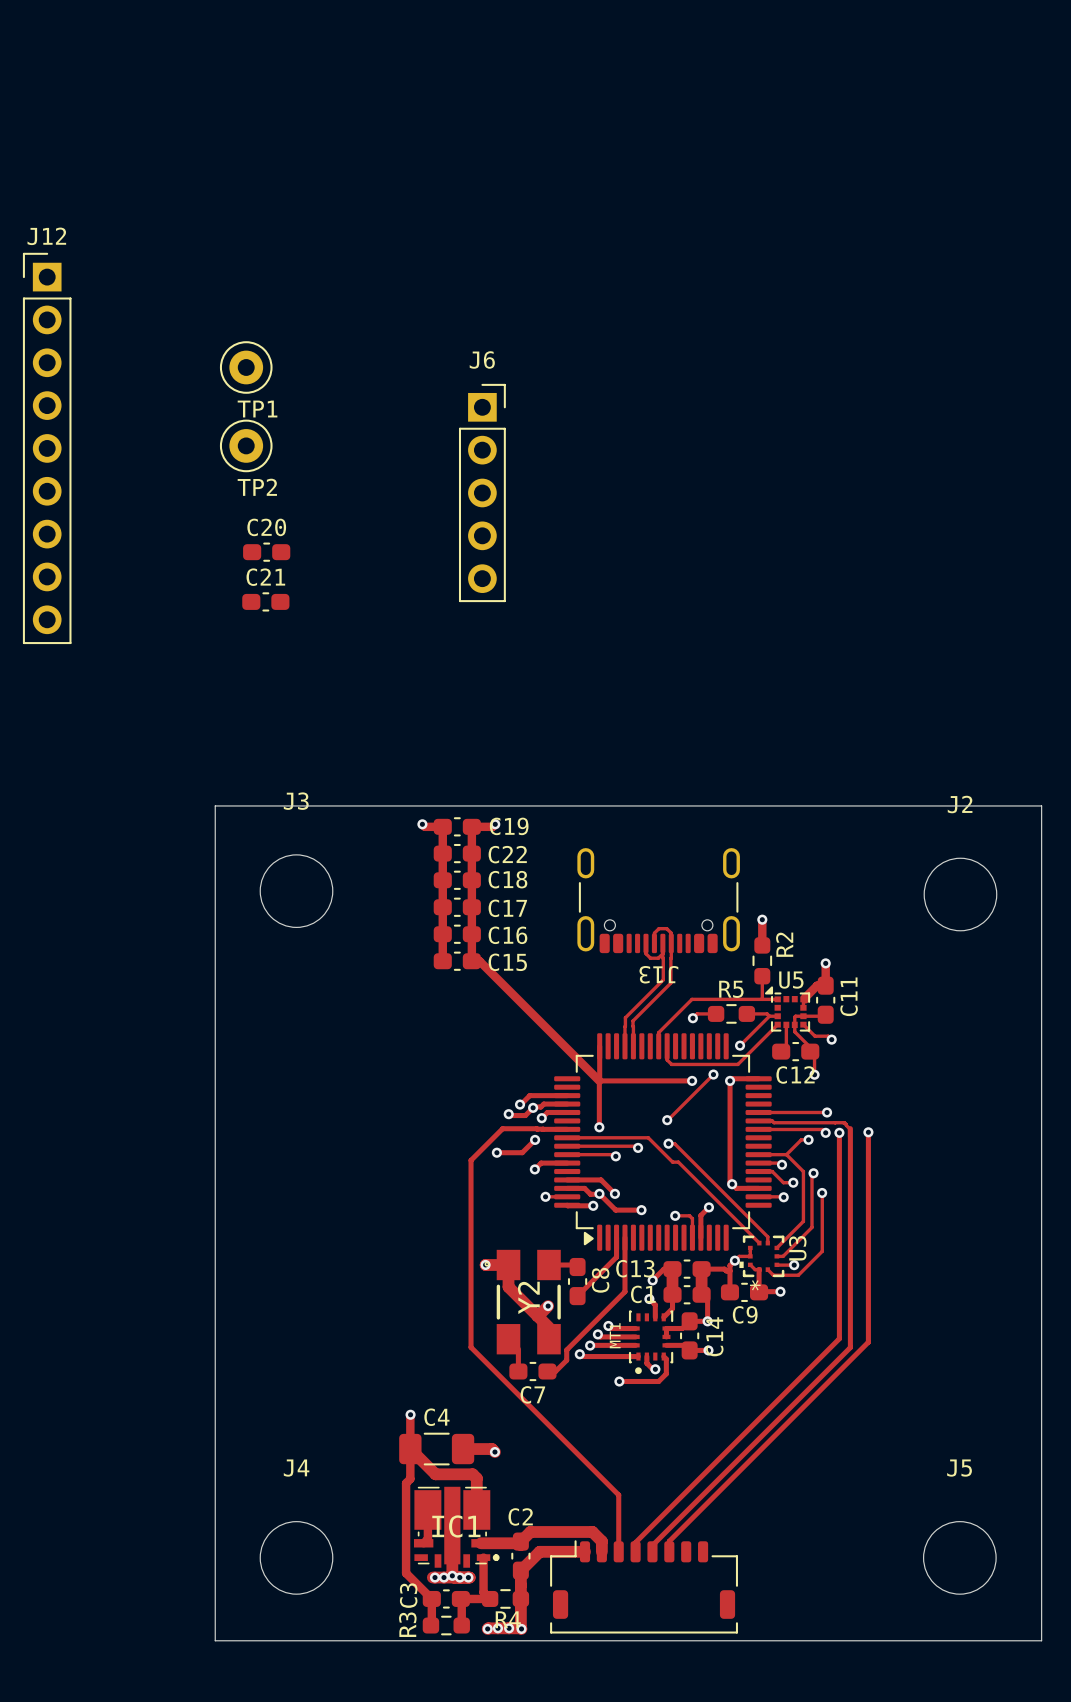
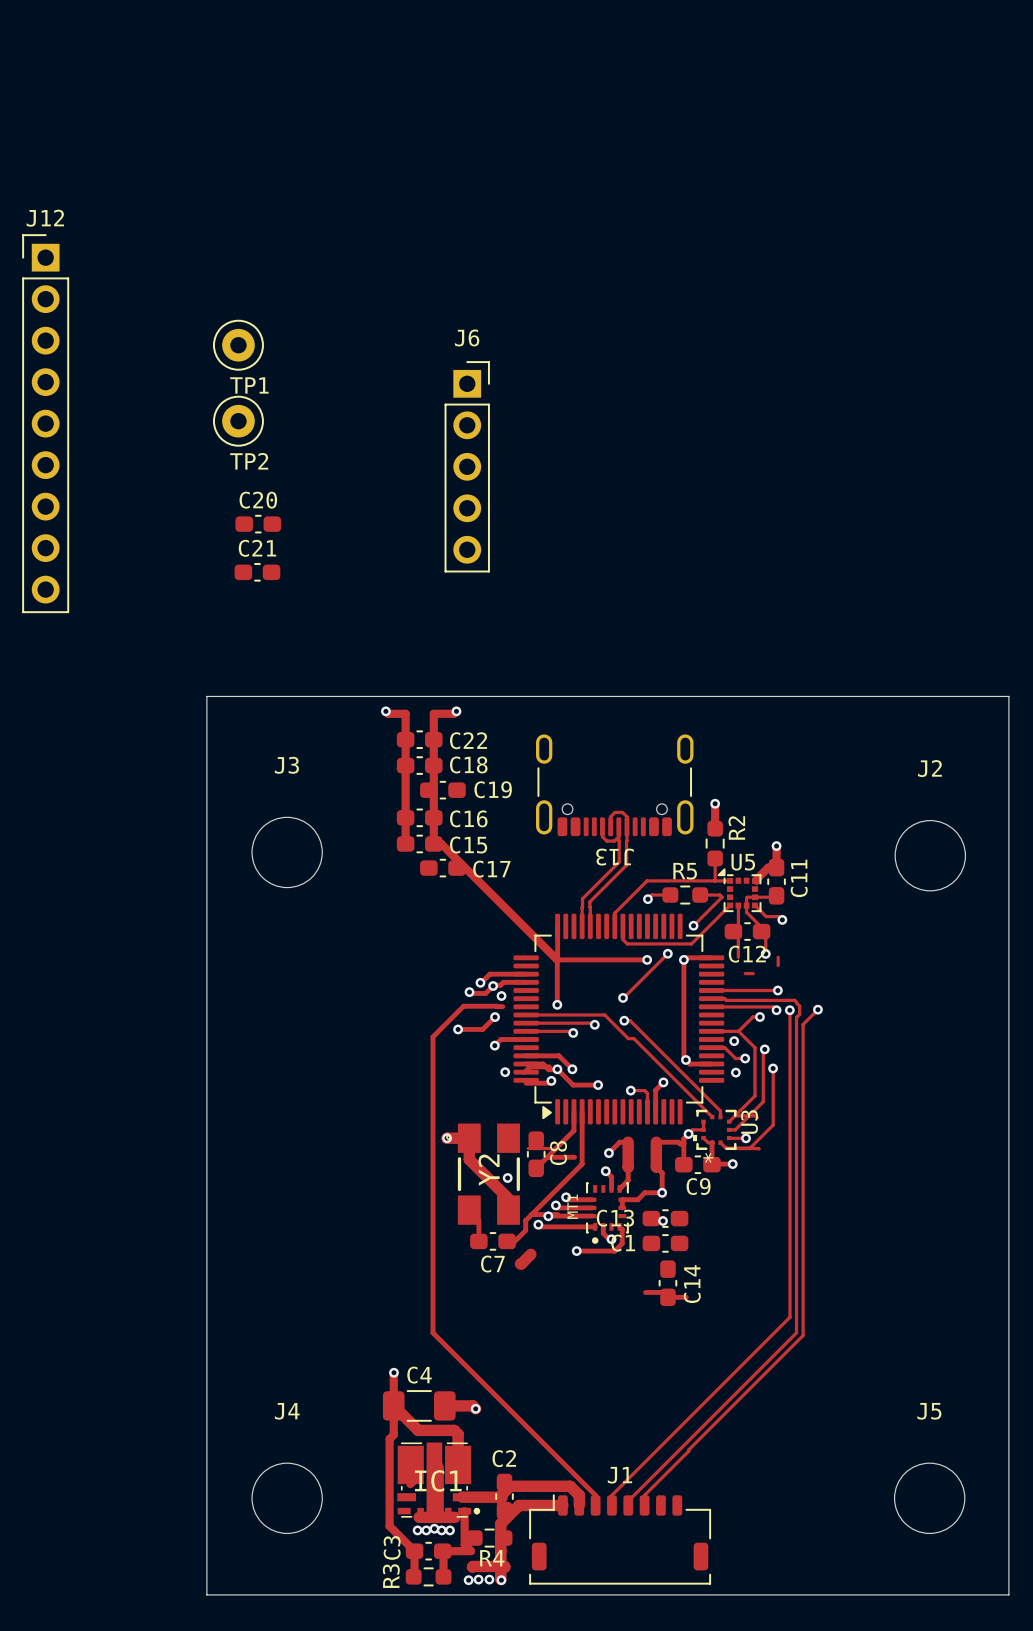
via: none -> (385, 711)
via: none -> (456, 711)
board edge: (1041, 805) (215, 805) (215, 1640) (1041, 1640) -> (1008, 769) (1008, 696) (206, 696) (206, 1594) (1008, 1594) (1008, 1578)
track: (422, 824) (424, 826) (442, 826) (442, 961) -> (385, 711) (388, 713) (405, 713) (405, 843)
via: (422, 824) -> none
track: (495, 824) (492, 826) (471, 826) (471, 961) (479, 961) (599, 1080) -> (456, 711) (454, 713) (433, 713) (433, 843) (441, 843) (557, 959)
via: (495, 824) -> none
track: none -> (715, 803) (715, 828)
via: none -> (715, 803)
C22 position: (457, 853) -> (419, 739)
C18 position: (457, 880) -> (419, 765)
via: none -> (776, 846)
track: none -> (715, 858) (715, 880)
J13 position: (658, 900) -> (614, 785)
track: (762, 919) (762, 945) -> (733, 931) (738, 926) (738, 905)
via: (762, 919) -> none
C16 position: (457, 934) -> (419, 817)
via: none -> (647, 899)
track: (646, 943) (646, 953) (650, 958) (658, 958) (662, 953) -> (602, 826) (602, 836) (606, 841) (614, 841) (618, 836)
track: (654, 943) (654, 933) (658, 928) (666, 928) (671, 933) (670, 983) (633, 1020) (633, 1046) -> (610, 826) (610, 816) (615, 812) (622, 812) (626, 816) (626, 865) (589, 901) (590, 926)
track: (662, 943) (663, 979) (625, 1017) (624, 1046) -> (618, 826) (619, 862) (582, 898) (582, 926)
R2 position: (762, 960) -> (715, 843)
C15 position: (457, 961) -> (419, 843)
track: (825, 963) (825, 985) (817, 985) (805, 999) -> (776, 846) (776, 867) (768, 867) (756, 880)
via position: (825, 963) -> (782, 919)
via: none -> (693, 925)
via: none -> (667, 953)
via: none -> (765, 953)
track: (777, 999) (692, 999) (658, 1032) (658, 1046) -> (730, 880) (647, 880) (614, 913) (614, 926)
C11 position: (825, 1000) -> (776, 881)
via: none -> (647, 959)
via: none -> (683, 959)
U5 position: (787, 1008) -> (739, 890)
track: (716, 1013) (697, 1013) (692, 1018) -> (670, 895) (652, 895) (647, 899)
R5 position: (731, 1013) -> (685, 895)
track: (746, 1013) (767, 1013) (769, 1016) (740, 1045) -> (700, 895) (719, 895) (722, 897) (693, 925)
track: (825, 1014) (794, 1017) (794, 1031) (810, 1047) (810, 1051) -> (776, 895) (746, 898) (746, 912) (761, 927) (761, 931)
via: (692, 1018) -> none
track: (777, 1024) (737, 1064) (671, 1064) (667, 1059) (667, 1046) -> (730, 905) (691, 943) (627, 943) (622, 939) (622, 926)
track: (786, 1024) (786, 1046) (781, 1051) -> none
track: (803, 1024) (814, 1036) (828, 1036) (831, 1039) -> (754, 905) (766, 916) (779, 916) (782, 919)
via: none -> (480, 982)
via: none -> (493, 986)
via: none -> (777, 990)
via: none -> (469, 992)
via: none -> (501, 996)
via: (831, 1039) -> none
via: none -> (623, 997)
track: none -> (711, 998) (794, 1000) (799, 1006) (799, 1014) (796, 1017) (796, 1332) (628, 1501)
via: (740, 1045) -> none
track: (599, 1046) (599, 1080) -> (557, 926) (557, 959)
via: none -> (557, 1004)
track: none -> (502, 1006) (463, 1006) (433, 1036) (433, 1332) (595, 1495) (595, 1505) (595, 1495)
C12 position: (795, 1051) -> (747, 931)
track: none -> (817, 1009) (803, 1024) (803, 1335) (644, 1495) (644, 1505)
via: none -> (817, 1009)
via: none -> (776, 1010)
track: none -> (789, 1010) (789, 1317) (611, 1495) (611, 1505)
via: none -> (789, 1010)
track: (814, 1055) (814, 1074) -> (765, 935) (765, 953)
via: none -> (495, 1017)
via: none -> (759, 1017)
via: none -> (624, 1020)
via: none -> (594, 1024)
via: none -> (458, 1029)
track: (713, 1074) (667, 1120) -> (667, 953) (623, 997)
via: (713, 1074) -> none
via: (814, 1074) -> none
via: none -> (573, 1032)
track: (758, 1078) (732, 1078) (730, 1080) (730, 1182) (736, 1188) (758, 1188) -> (711, 957) (685, 957) (683, 959) (683, 1057) (689, 1064) (711, 1064)
track: (599, 1080) (599, 1126) -> (557, 959) (557, 1004)
track: (599, 1080) (692, 1080) -> (557, 959) (647, 959)
via: (692, 1080) -> none
via: (730, 1080) -> none
via: none -> (734, 1041)
via: none -> (494, 1045)
via: none -> (764, 1049)
track: (567, 1095) (529, 1095) (520, 1104) -> (526, 974) (489, 974) (481, 982)
via: none -> (745, 1058)
via: (520, 1104) -> none
track: (567, 1104) (543, 1104) (540, 1106) (533, 1106) (525, 1115) (508, 1114) -> (526, 982) (503, 982) (500, 985) (493, 985) (485, 993) (469, 992)
via: none -> (685, 1059)
via: (533, 1107) -> none
track: (758, 1112) (827, 1112) -> (711, 990) (777, 990)
via: (827, 1112) -> none
via: (508, 1114) -> none
via: none -> (557, 1069)
via: none -> (572, 1069)
via: none -> (773, 1068)
via: none -> (505, 1072)
via: (541, 1118) -> none
via: none -> (735, 1072)
via: (667, 1120) -> none
track: (758, 1120) (844, 1122) (849, 1128) (849, 1137) -> none
via: none -> (551, 1080)
via: (599, 1127) -> none
via: none -> (663, 1082)
track: (850, 1128) (850, 1347) (652, 1545) (652, 1551) -> none
track: (543, 1129) (502, 1128) (471, 1160) -> none
track: (758, 1129) (822, 1129) (825, 1132) -> (711, 1006) (773, 1006) (776, 1010)
via: none -> (598, 1085)
via: (825, 1132) -> none
via: (839, 1132) -> none
track: (868, 1132) (868, 1342) (669, 1541) (669, 1551) -> none
via: (868, 1132) -> none
track: (839, 1133) (839, 1338) (635, 1542) (635, 1551) -> none
via: none -> (630, 1090)
track: (567, 1137) (648, 1137) (672, 1162) (678, 1162) (759, 1243) -> (526, 1015) (604, 1015) (628, 1038) (633, 1038) (712, 1117)
track: (535, 1139) (522, 1152) (496, 1152) -> (495, 1017) (482, 1029) (458, 1029)
via: (535, 1139) -> none
track: (808, 1139) (801, 1139) (786, 1154) -> (759, 1017) (752, 1017) (738, 1031)
via: (808, 1139) -> none
part position: (662, 1142) -> (618, 1019)
track: (668, 1143) (674, 1143) (767, 1236) (767, 1243) -> (624, 1020) (630, 1020) (720, 1110) (720, 1117)
via: (668, 1143) -> none
track: (567, 1146) (636, 1146) (638, 1147) -> (526, 1023) (593, 1023) (594, 1024)
via: (638, 1147) -> none
via: (496, 1152) -> none
track: (567, 1154) (614, 1154) (615, 1156) -> (526, 1031) (571, 1031) (573, 1032)
track: (758, 1154) (786, 1154) -> (711, 1031) (738, 1031)
track: (786, 1154) (803, 1171) (803, 1221) (776, 1247) -> (738, 1031) (754, 1047) (754, 1095) (729, 1121)
via: (615, 1156) -> none
track: (471, 1160) (471, 1347) (618, 1495) (618, 1551) -> none
track: (567, 1163) (541, 1163) (534, 1169) -> (526, 1039) (500, 1039) (494, 1046)
via: (782, 1164) -> none
via: (534, 1169) -> none
track: (758, 1171) (772, 1171) (783, 1182) (793, 1182) -> (711, 1047) (724, 1047) (735, 1058) (745, 1058)
track: (813, 1173) (812, 1174) (812, 1227) (783, 1256) (776, 1256) -> (764, 1049) (763, 1101) (735, 1129) (729, 1129)
via: (813, 1173) -> none
track: (567, 1179) (601, 1179) (614, 1193) -> (526, 1055) (558, 1055) (572, 1069)
via: none -> (688, 1134)
via: (793, 1182) -> none
via: (732, 1184) -> none
via: none -> (447, 1138)
via: none -> (746, 1138)
track: (567, 1188) (584, 1188) (590, 1194) (599, 1193) (615, 1210) (641, 1210) -> (526, 1064) (543, 1064) (548, 1069) (557, 1069) (573, 1085) (598, 1085)
via: (822, 1192) -> none
via: (599, 1193) -> none
via: (614, 1193) -> none
track: (822, 1193) (822, 1251) (798, 1275) (773, 1275) (767, 1269) -> (773, 1068) (773, 1125) (750, 1148) (725, 1148) (720, 1142)
via: (545, 1196) -> none
via: (783, 1197) -> none
via: none -> (608, 1153)
via: (593, 1205) -> none
track: (708, 1207) (700, 1215) (700, 1237) -> (663, 1082) (655, 1090) (655, 1111)
via: (708, 1207) -> none
via: (641, 1210) -> none
via: none -> (732, 1164)
track: (675, 1215) (689, 1215) (692, 1218) (692, 1237) -> (630, 1090) (644, 1090) (647, 1093) (647, 1111)
via: (675, 1215) -> none
via: none -> (605, 1171)
via: none -> (507, 1178)
track: (616, 1237) (616, 1257) (577, 1296) -> (573, 1111) (573, 1130) (536, 1168)
track: (624, 1237) (624, 1291) (566, 1350) (566, 1360) (555, 1371) (547, 1371) -> (582, 1111) (582, 1164) (525, 1220) (525, 1230) (514, 1241) (507, 1241)
via: none -> (662, 1192)
via: none -> (566, 1197)
track: (750, 1247) (750, 1256) (739, 1256) (734, 1260) -> (703, 1121) (703, 1129) (692, 1129) (688, 1134)
via: none -> (555, 1205)
U3 position: (761, 1256) -> (714, 1129)
track: (734, 1260) (729, 1265) (729, 1292) -> (688, 1134) (683, 1138) (683, 1164)
via: (734, 1260) -> none
via: (485, 1264) -> none
track: (750, 1264) (755, 1269) (759, 1269) (759, 1291) (780, 1291) -> (703, 1138) (708, 1142) (712, 1142) (712, 1164) (732, 1164)
track: (776, 1264) (794, 1265) -> (729, 1138) (746, 1138)
track: (485, 1265) (508, 1265) (508, 1287) (548, 1327) -> (447, 1138) (469, 1138) (469, 1159) (508, 1198)
via: (794, 1265) -> none
via: none -> (548, 1216)
track: (729, 1270) (701, 1269) (701, 1294) (707, 1300) (707, 1321) (689, 1321) (682, 1328) (666, 1328) (666, 1336) -> (683, 1143) (656, 1142) (656, 1167) (662, 1172) (662, 1192) (644, 1192) (637, 1199) (622, 1199) (622, 1207)
via: none -> (663, 1220)
via: none -> (538, 1224)
track: (652, 1280) (663, 1269) (672, 1269) (672, 1308) (663, 1317) -> (608, 1153) (619, 1142) (628, 1142) (628, 1180) (619, 1188)
via: (652, 1280) -> none
C8 position: (577, 1281) -> (536, 1154)
via: none -> (611, 1239)
via: (780, 1291) -> none
C9 position: (744, 1292) -> (697, 1164)
track: (649, 1299) (655, 1304) (655, 1317) -> (605, 1171) (611, 1176) (611, 1188)
via: (649, 1299) -> none
Y2 position: (522, 1302) -> (483, 1174)
via: none -> (576, 1251)
via: (548, 1306) -> none
via: (707, 1321) -> none
track: (608, 1325) (610, 1328) (635, 1328) -> (566, 1197) (568, 1199) (592, 1199)
via: (608, 1325) -> none
track: (597, 1334) (600, 1336) (635, 1336) -> (555, 1205) (558, 1207) (592, 1207)
via: (597, 1334) -> none
MT1 position: (651, 1342) -> (607, 1213)
track: (590, 1345) (635, 1345) -> (548, 1216) (592, 1216)
via: (590, 1345) -> none
track: (518, 1349) (518, 1371) -> (478, 1219) (478, 1241)
via: (708, 1350) -> none
track: (579, 1354) (582, 1356) (638, 1356) -> (538, 1224) (540, 1226) (595, 1226)
via: (579, 1354) -> none
track: (646, 1356) (646, 1363) (655, 1369) -> (603, 1226) (603, 1233) (611, 1239)
track: (663, 1356) (666, 1359) (666, 1373) (658, 1381) (619, 1381) -> (619, 1226) (622, 1229) (622, 1243) (614, 1251) (576, 1251)
via: (655, 1369) -> none
C7 position: (532, 1371) -> (492, 1241)
via: (619, 1381) -> none
track: (410, 1414) (410, 1478) (406, 1483) (406, 1573) (431, 1598) (430, 1625) -> (393, 1372) (393, 1434) (389, 1439) (389, 1526) (414, 1551) (413, 1576)
via position: (410, 1414) -> (393, 1372)
track: (410, 1449) (435, 1474) (472, 1474) (476, 1478) (476, 1509) -> (393, 1405) (418, 1430) (454, 1430) (458, 1434) (458, 1464)
C4 position: (436, 1449) -> (419, 1405)
track: (463, 1449) (491, 1449) (494, 1452) -> (444, 1405) (472, 1405) (475, 1408)
via position: (494, 1452) -> (475, 1408)
IC1 position: (456, 1527) -> (438, 1481)
J1 name: none -> J1 (619, 1475)
track: (520, 1541) (530, 1531) (592, 1531) (601, 1541) (601, 1551) -> (500, 1495) (510, 1486) (570, 1486) (579, 1495) (579, 1505)
track: (481, 1543) (522, 1543) -> (462, 1497) (502, 1497)
track: (585, 1551) (539, 1551) (520, 1570) (520, 1628) -> (562, 1505) (519, 1505) (500, 1523) (500, 1579)
track: (483, 1557) (483, 1592) (490, 1598) (460, 1598) (461, 1625) -> (464, 1511) (464, 1544) (471, 1551) (442, 1551) (443, 1576)
via: (452, 1575) -> none
via: (434, 1577) -> none
via: (443, 1577) -> none
via: (459, 1577) -> none
via: (468, 1577) -> none
J1 position: (644, 1586) -> (620, 1539)
via: none -> (434, 1528)
via: none -> (417, 1530)
via: none -> (426, 1530)
via: none -> (441, 1530)
via: none -> (449, 1530)
C3 position: (446, 1598) -> (428, 1551)
R3 position: (446, 1625) -> (428, 1576)
via: (487, 1628) -> none
via: (497, 1628) -> none
via: (509, 1628) -> none
via: (521, 1628) -> none
via: none -> (478, 1579)
via: none -> (489, 1579)
via: none -> (468, 1580)
via: none -> (501, 1580)

